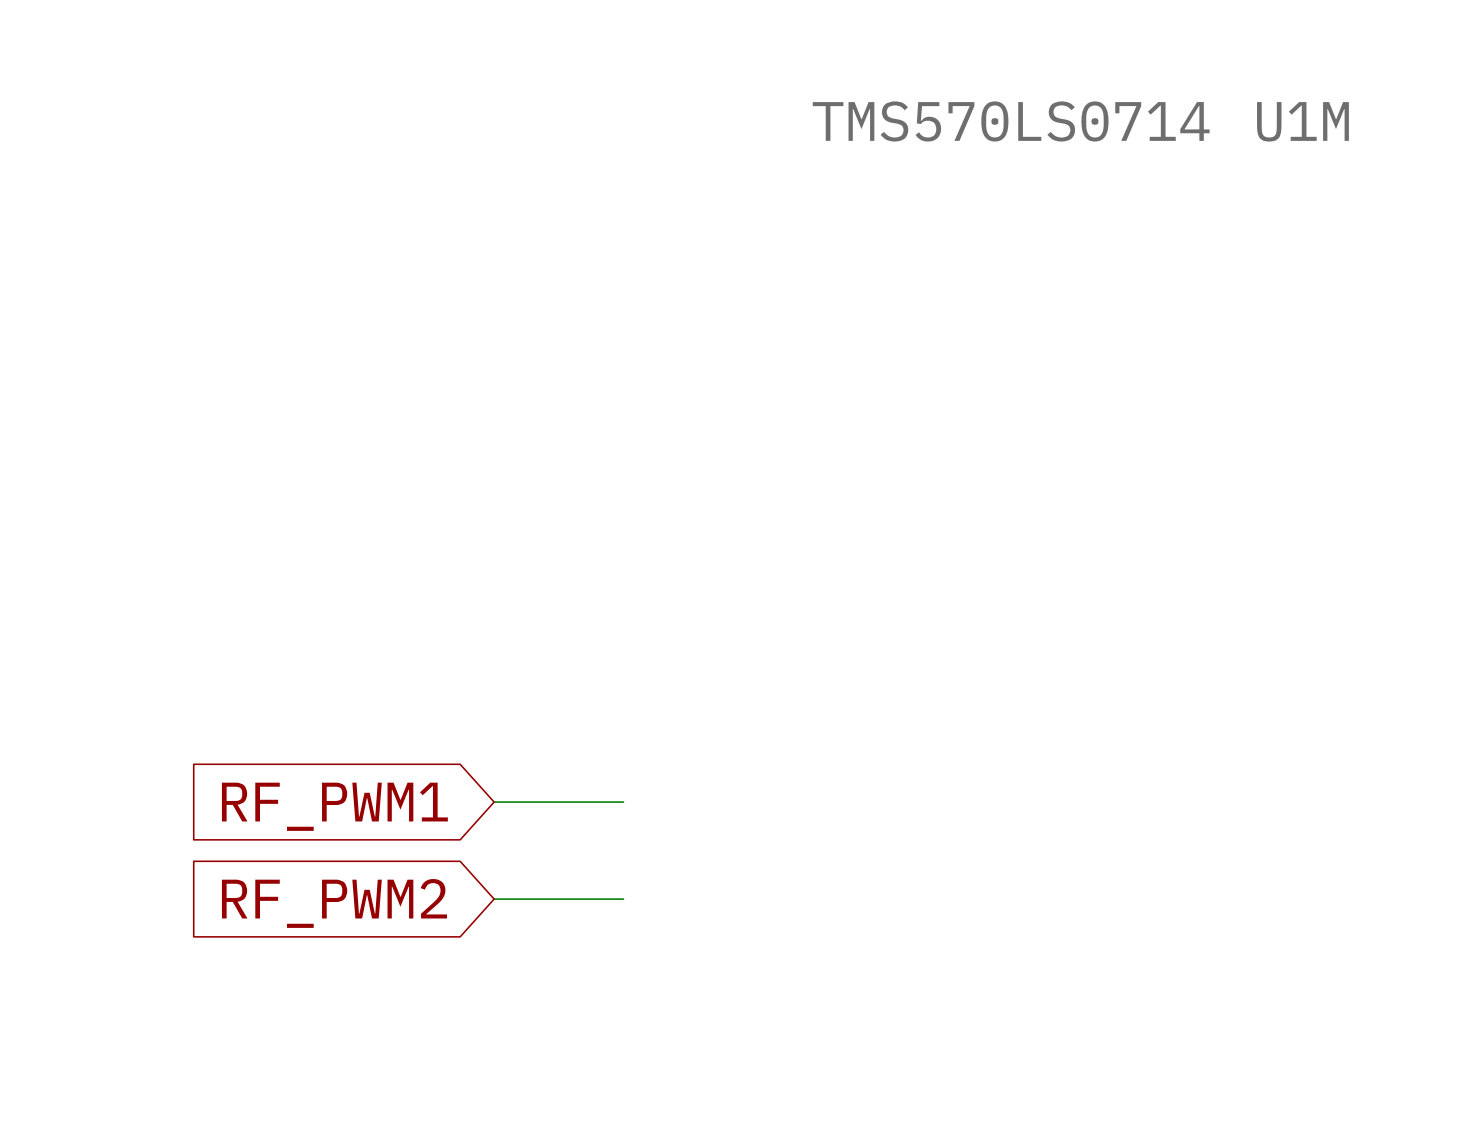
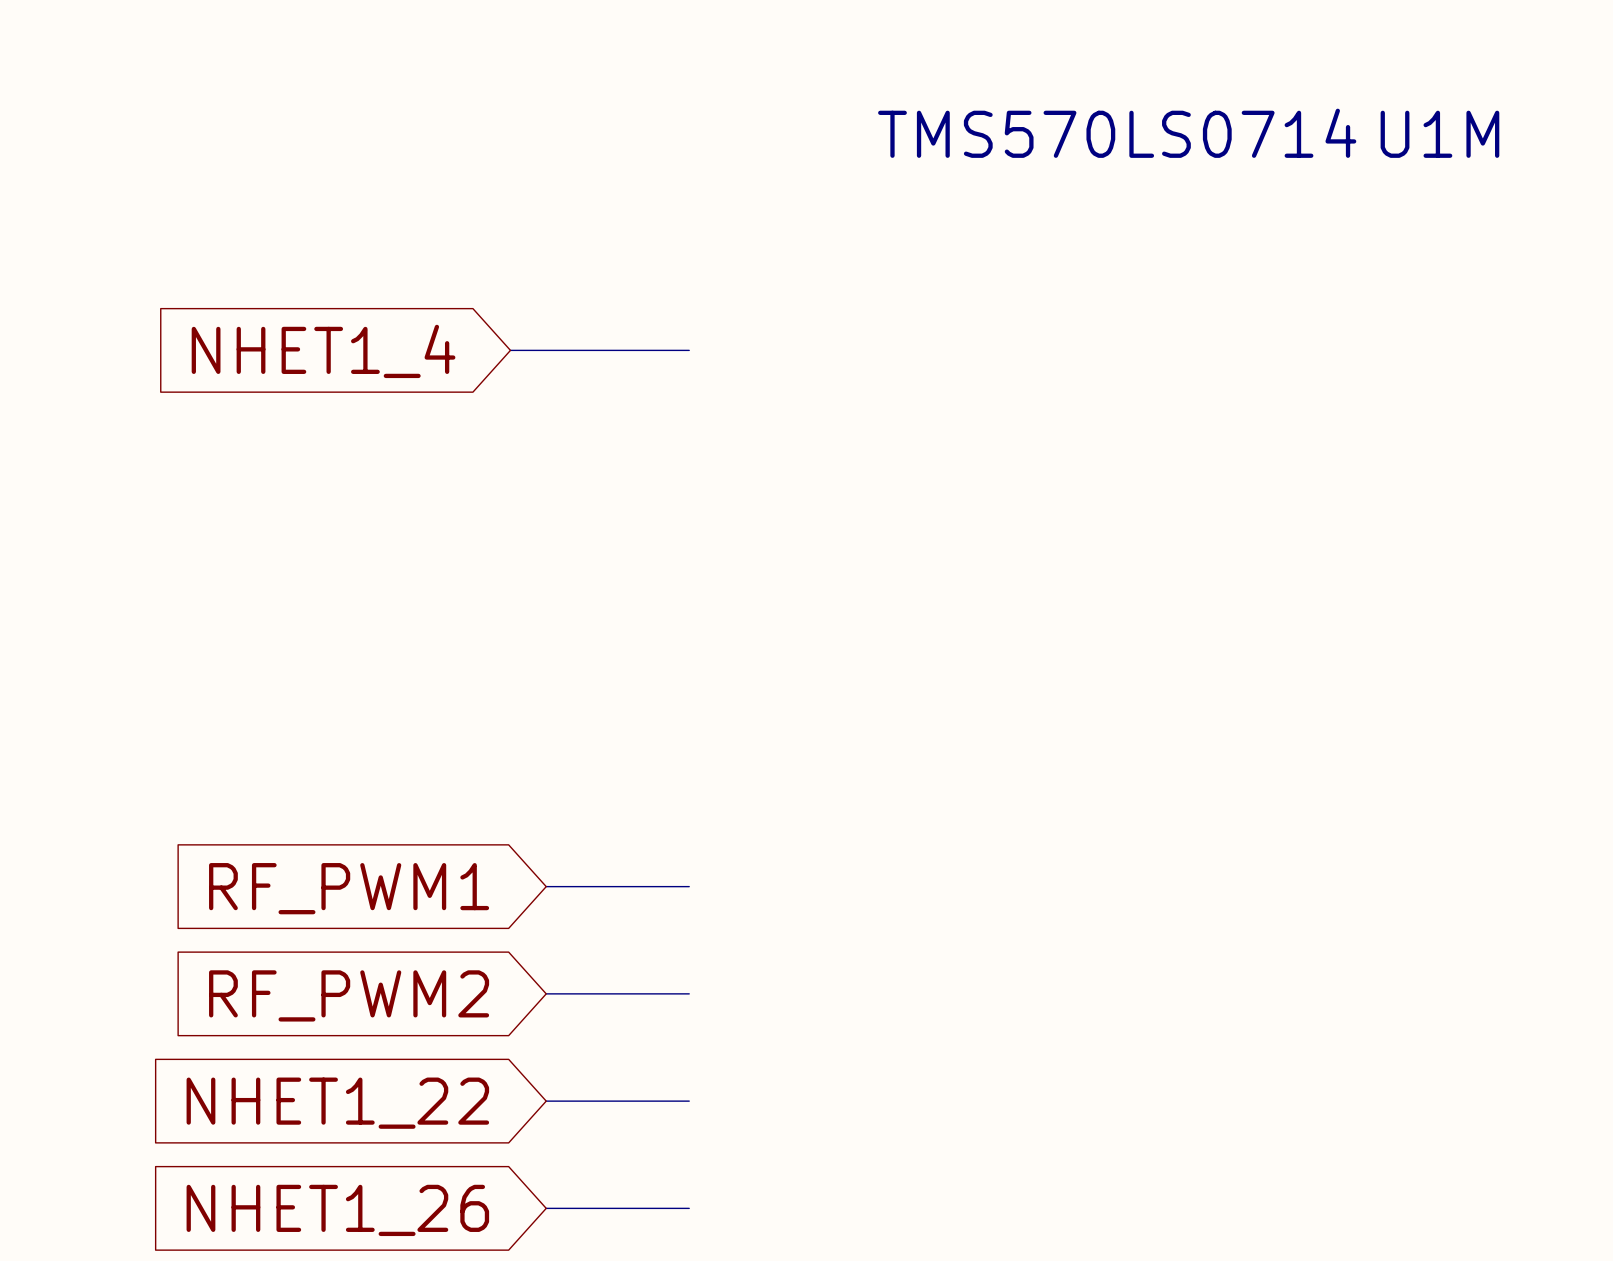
wire: none -> (510, 350) (689, 350)
global label: none -> NHET1_4 (323, 351)
wire: none -> (546, 1101) (689, 1101)
global label: none -> NHET1_22 (337, 1103)
wire: none -> (546, 1208) (689, 1208)
global label: none -> NHET1_26 (337, 1210)

